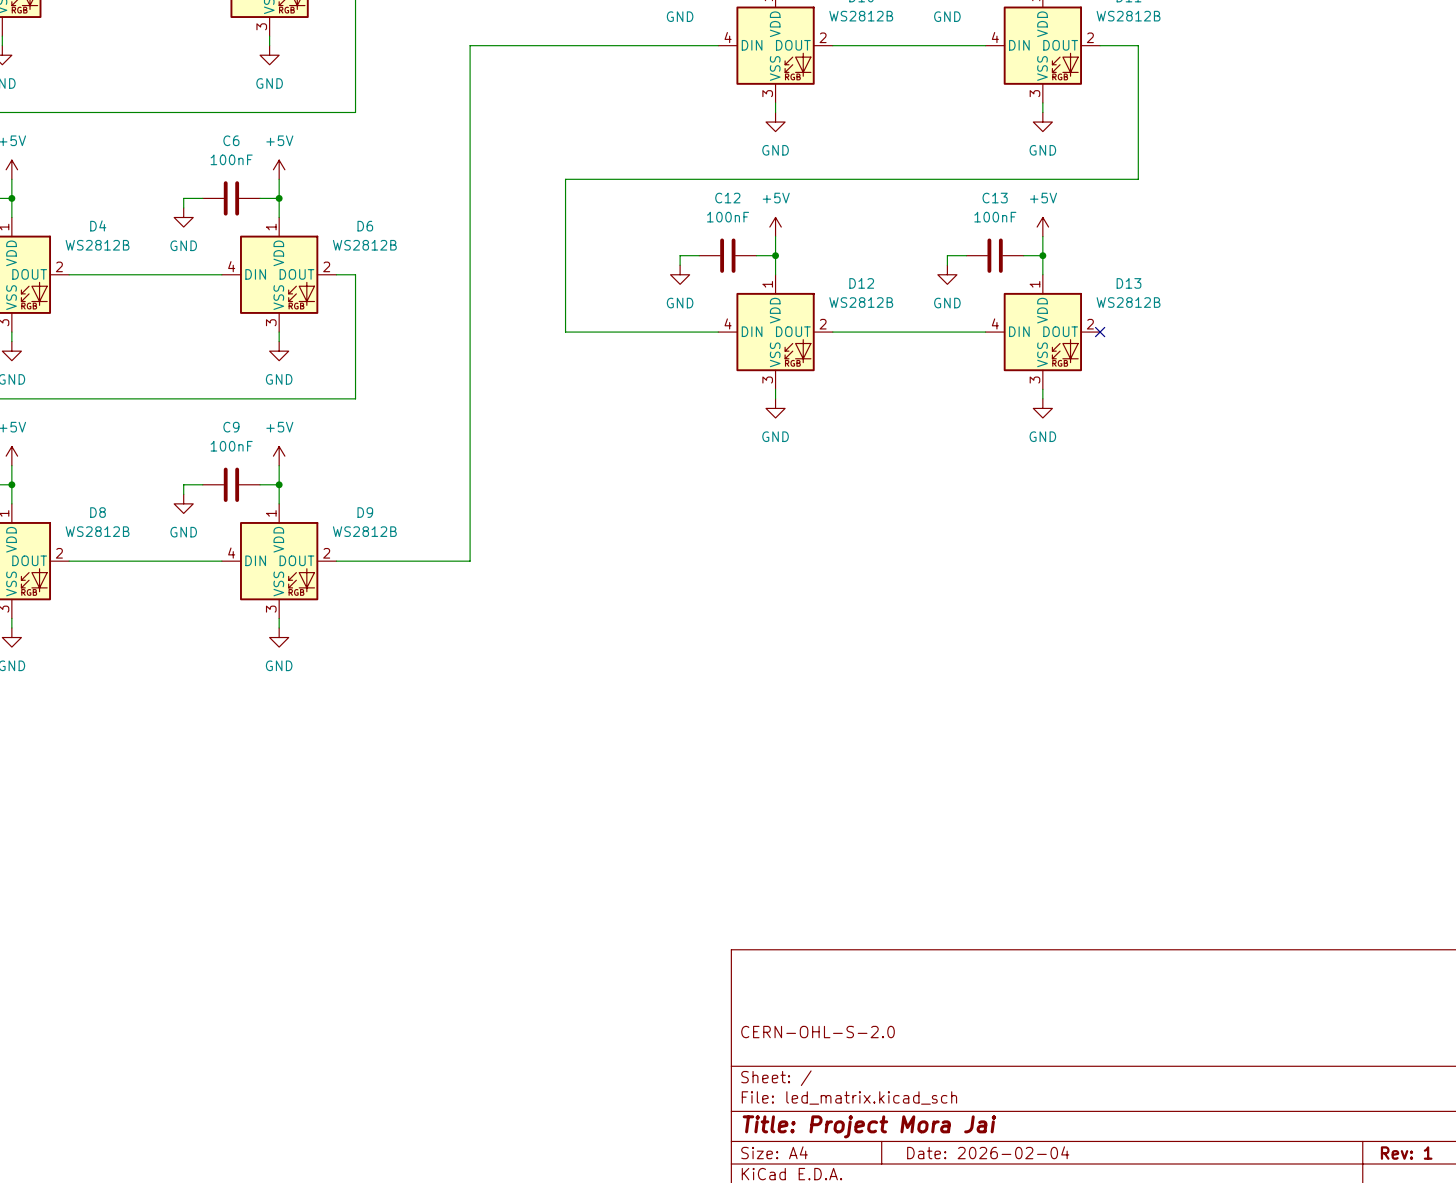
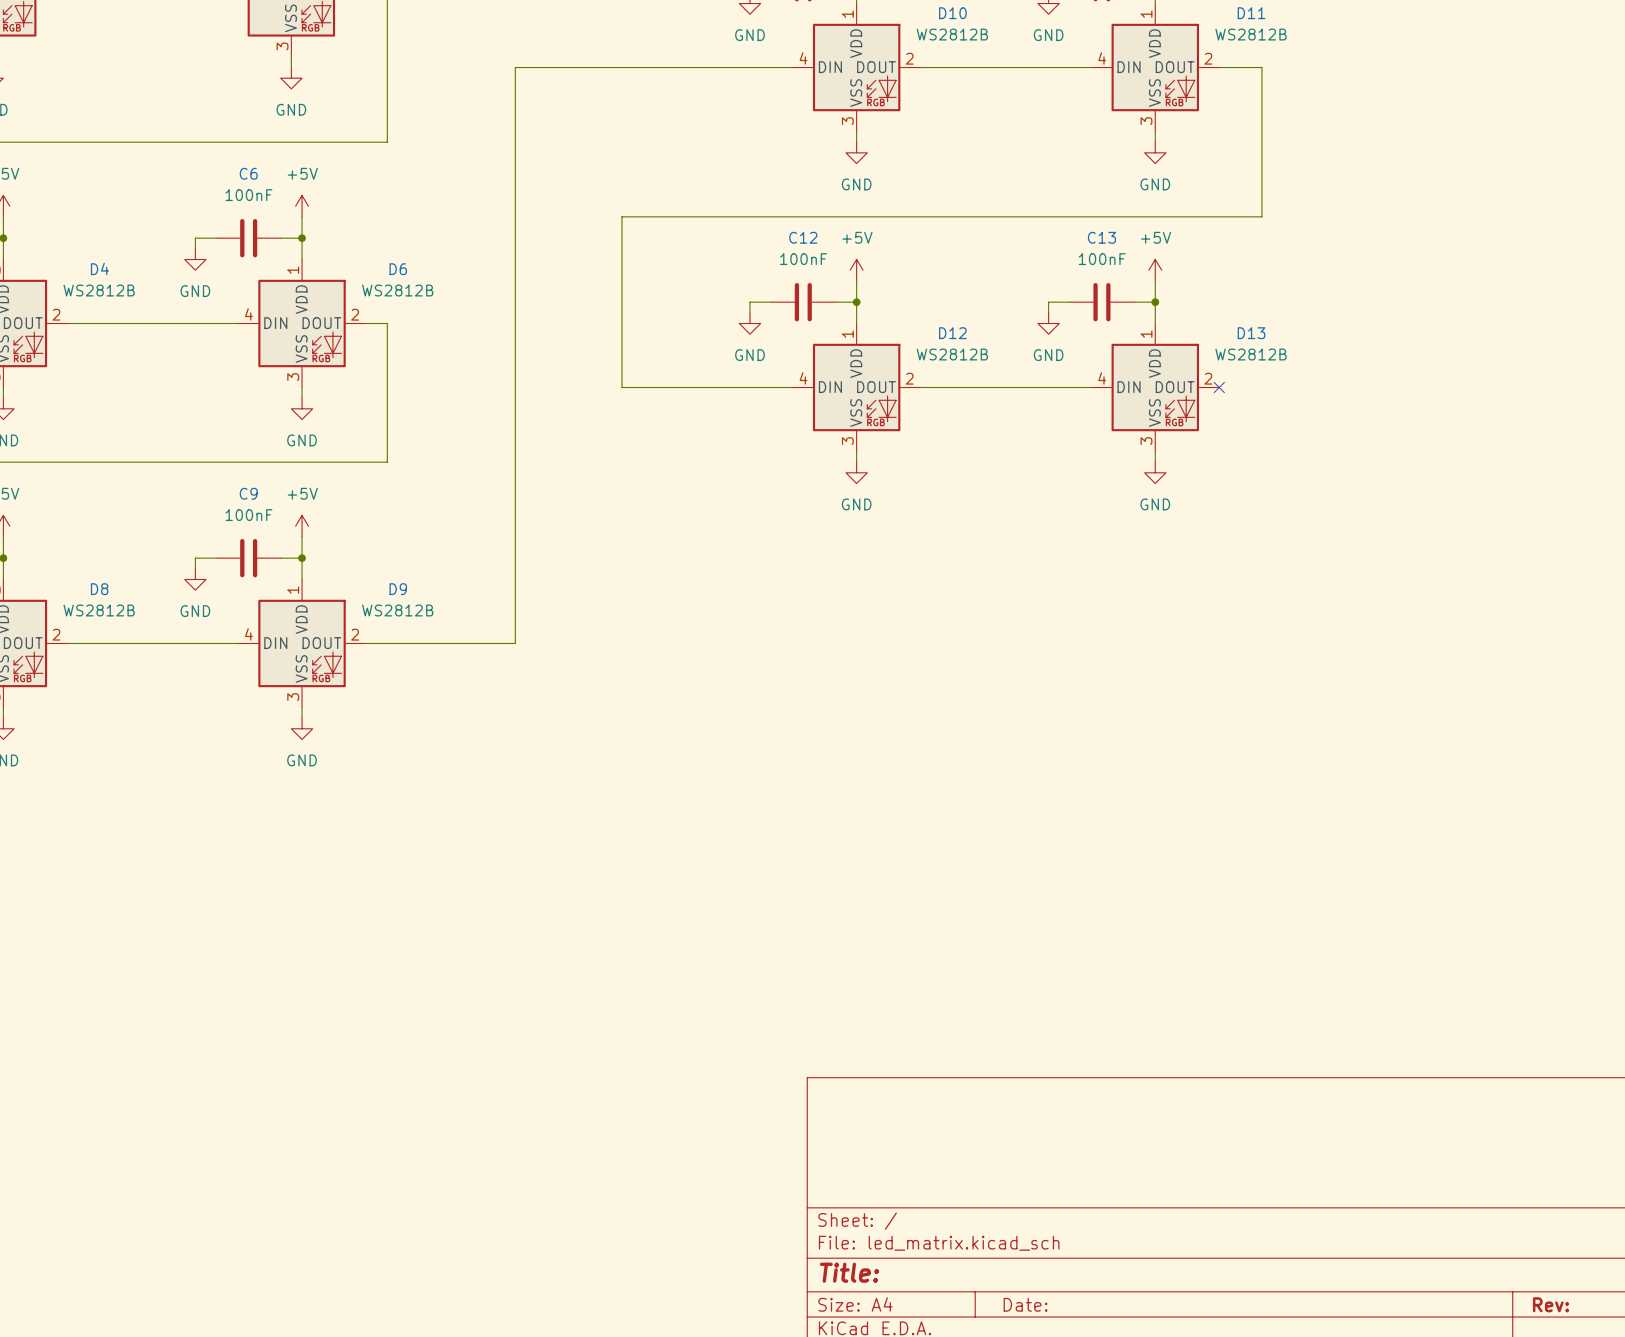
title block: CERN-OHL-S-2.0 (818, 1032) -> none
title block: Title: Project Mora Jai (869, 1126) -> Title: (849, 1272)
title block: Date: 2026-02-04 (988, 1152) -> Date: (1025, 1304)
title block: Rev: 1 (1406, 1153) -> Rev: (1550, 1304)

